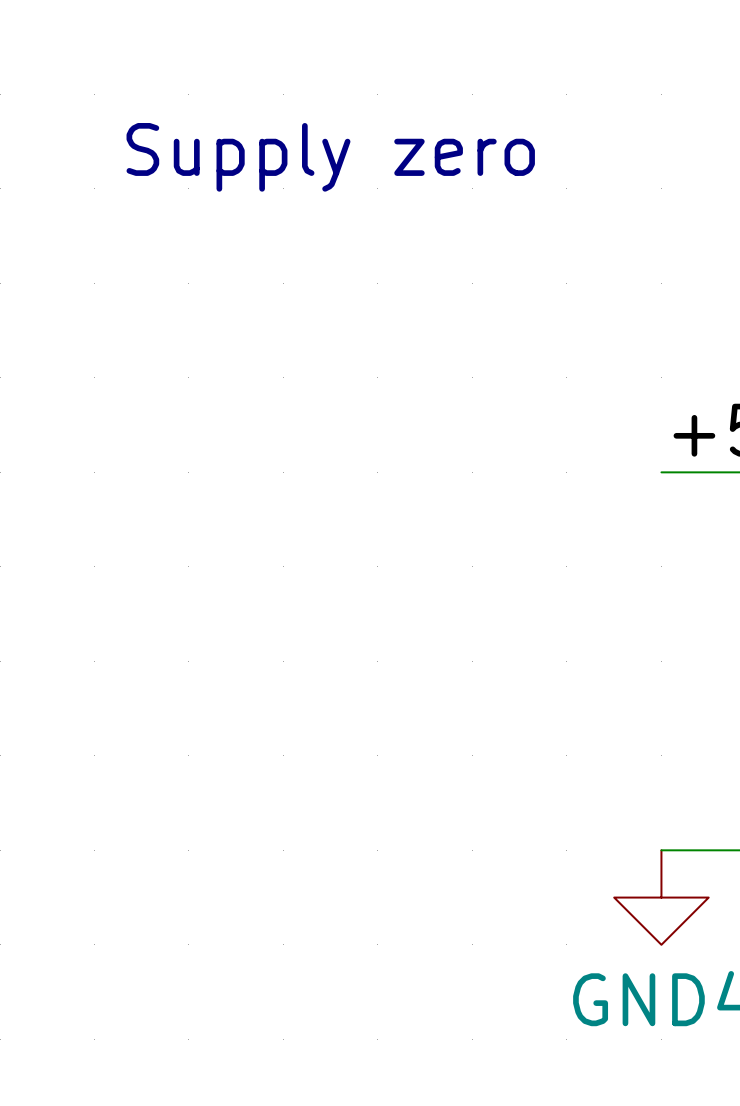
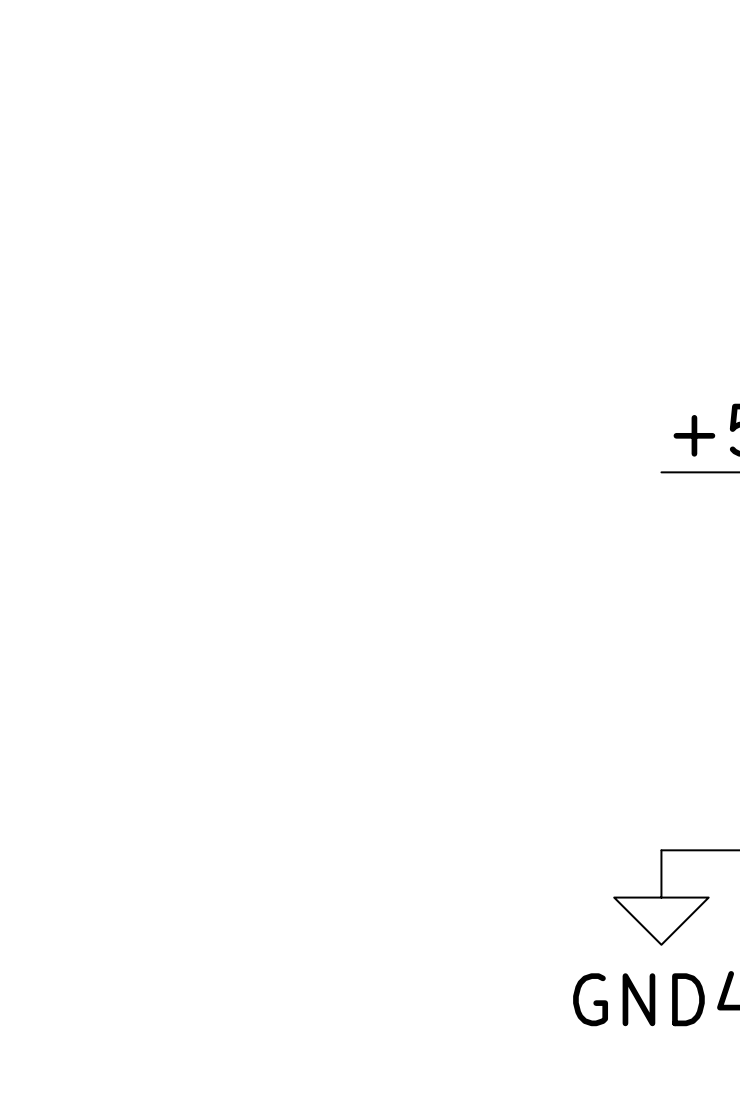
text: Supply zero (330, 157) -> none

